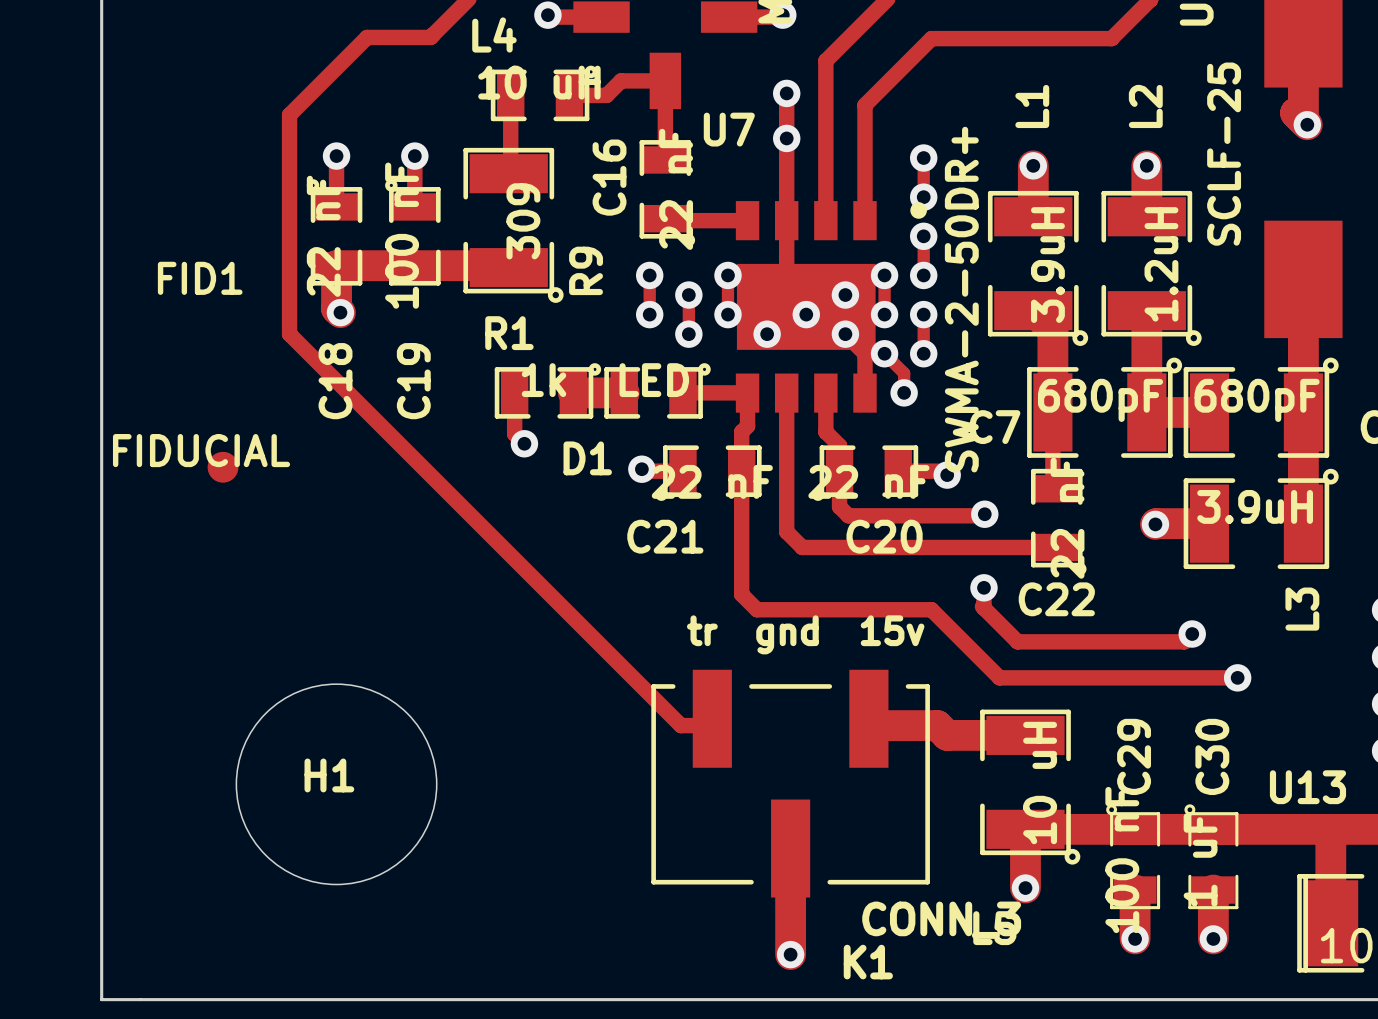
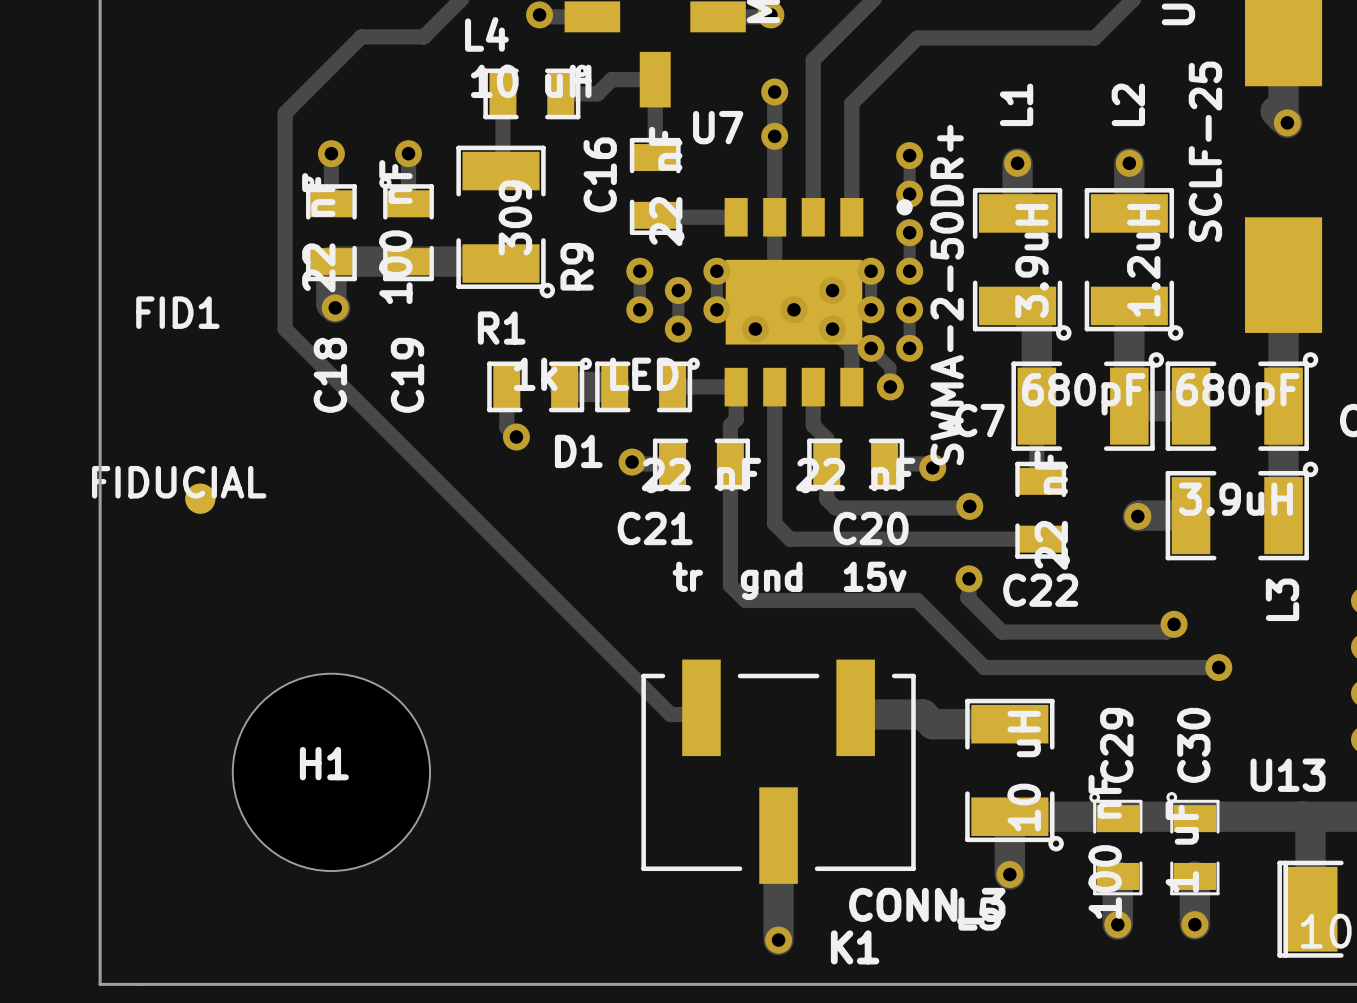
FID1 position: (223, 467) -> (200, 498)
text position: tr gnd 15v (805, 634) -> tr gnd 15v (789, 580)

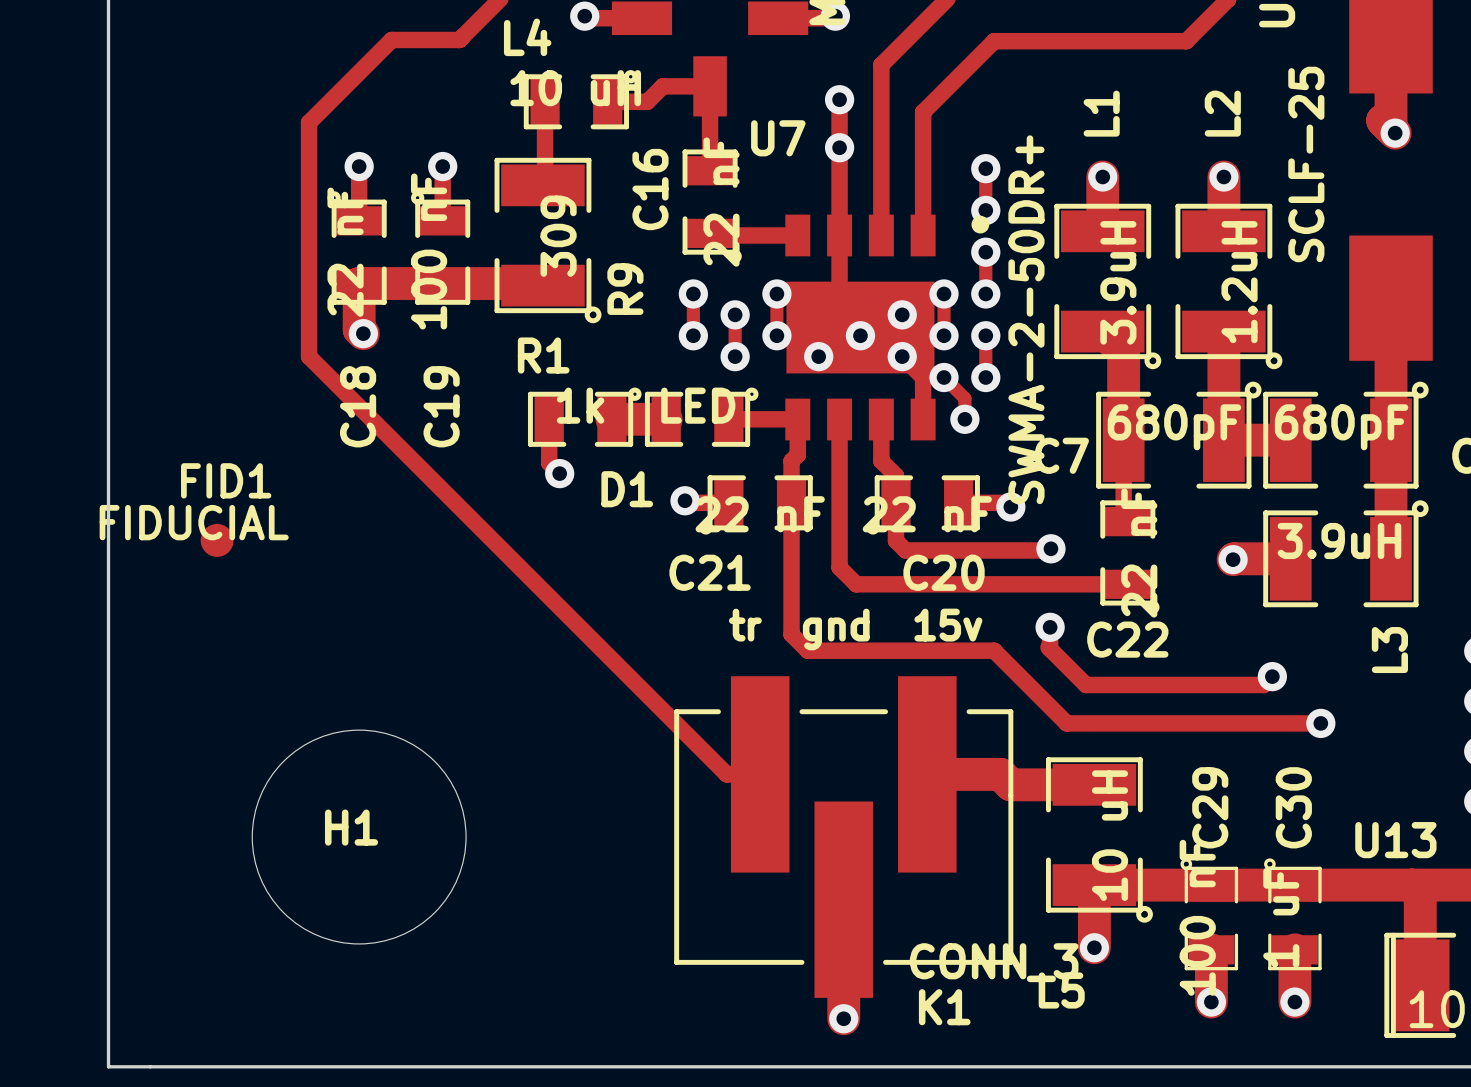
FID1 name position: FID1 (177, 312) -> FID1 (226, 480)
K1 footprint: [641, 659, 916, 884] -> [674, 676, 1014, 998]

